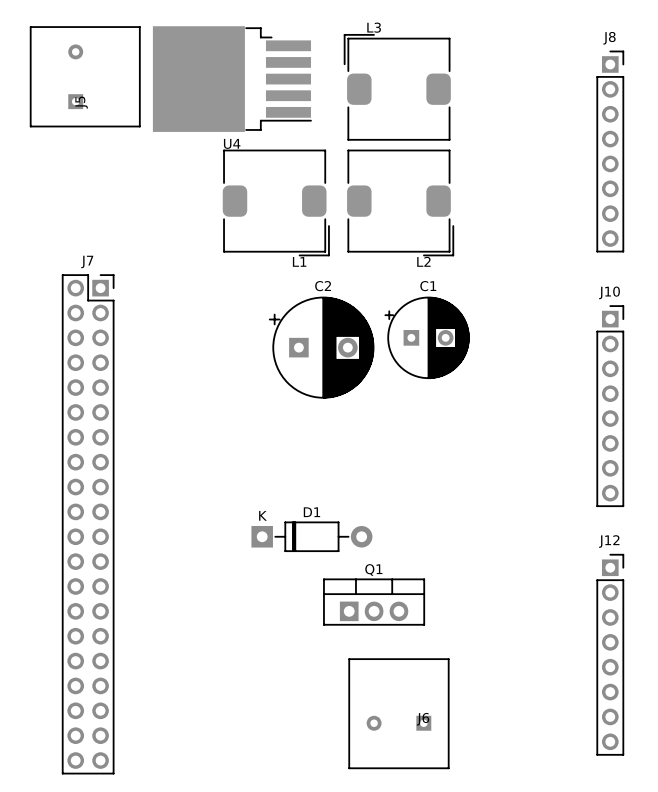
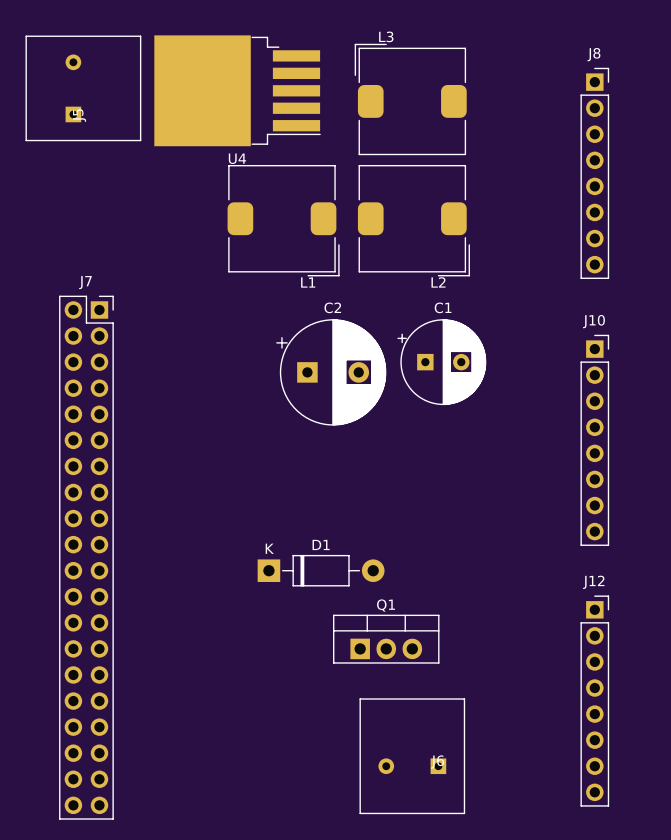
J8 position: (610, 151) -> (594, 173)
J10 position: (610, 406) -> (594, 440)
J12 position: (610, 654) -> (594, 701)

